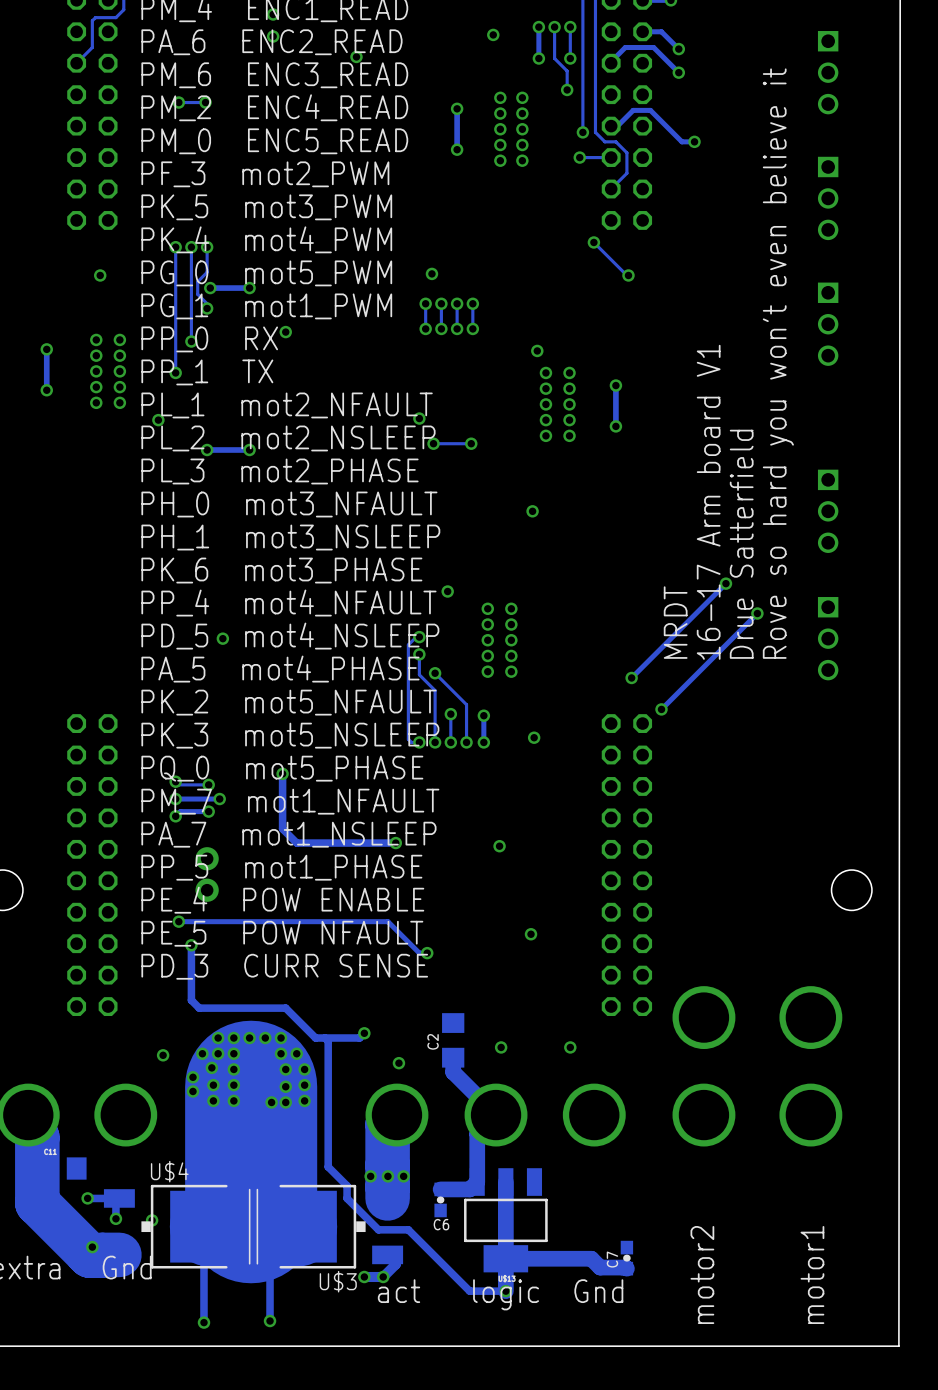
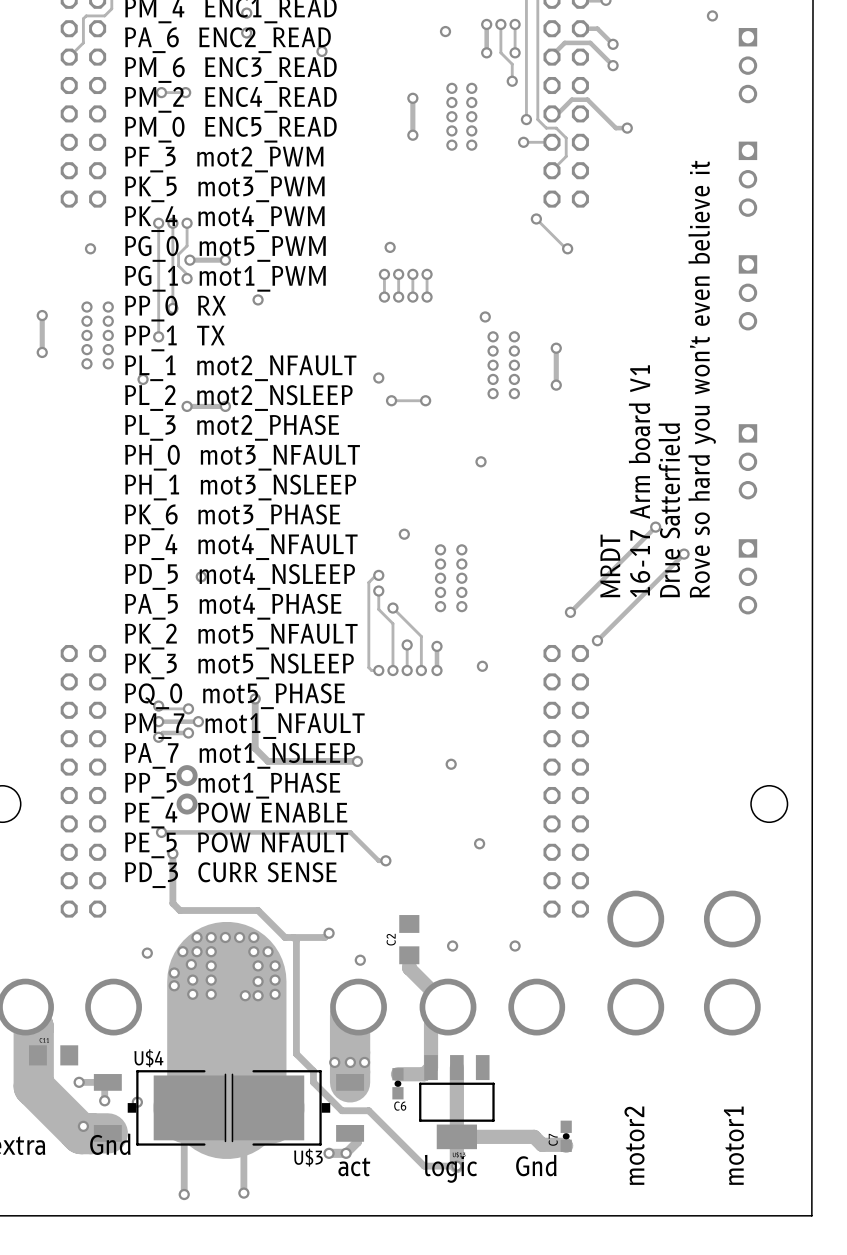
via: none -> (712, 15)

